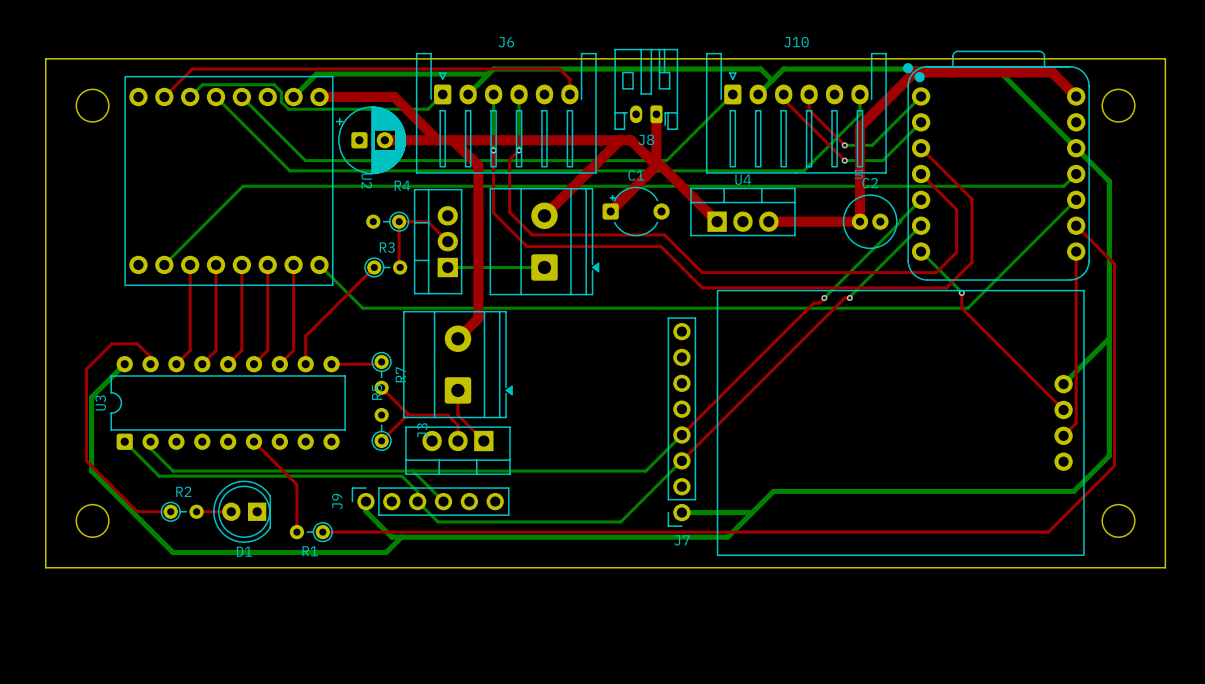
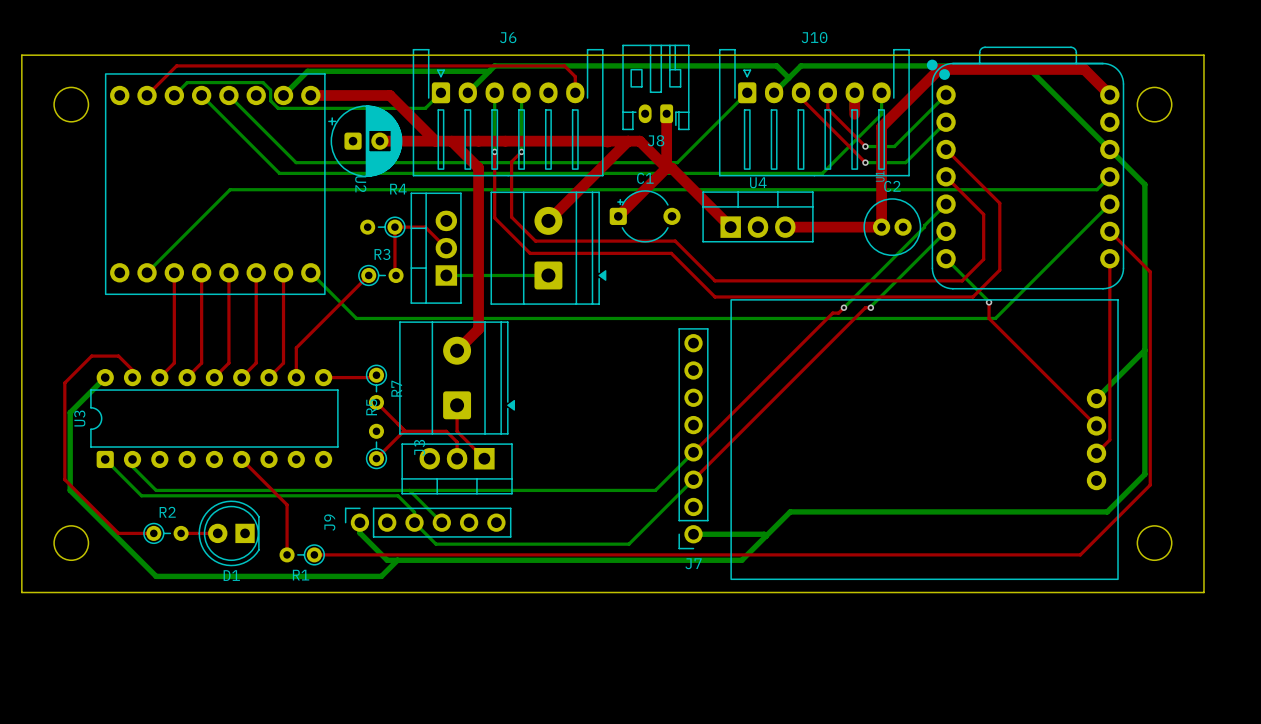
top track: none -> (854, 92) (854, 114)

